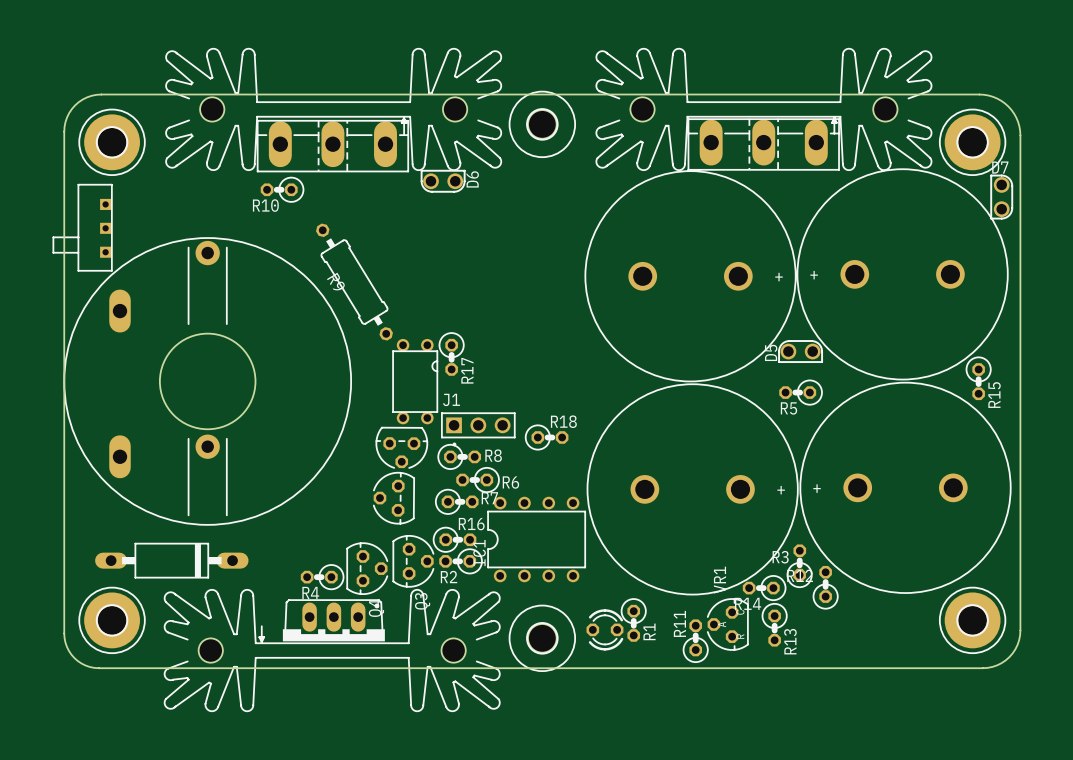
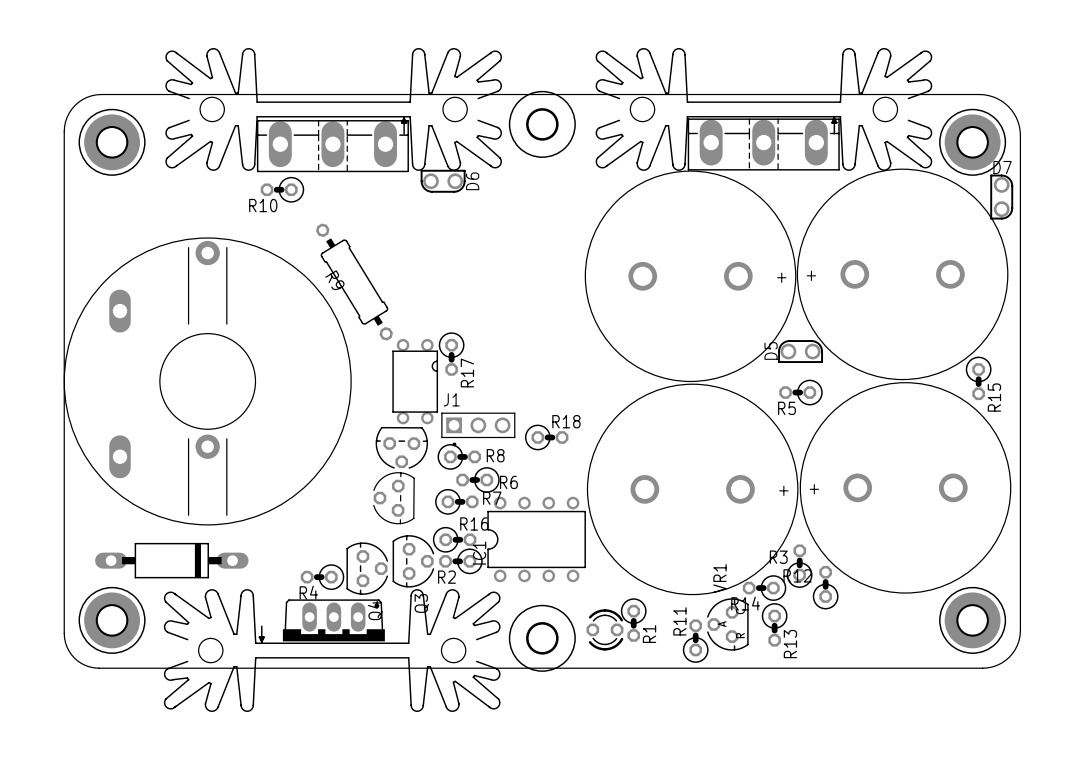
part: (82, 227) -> none

